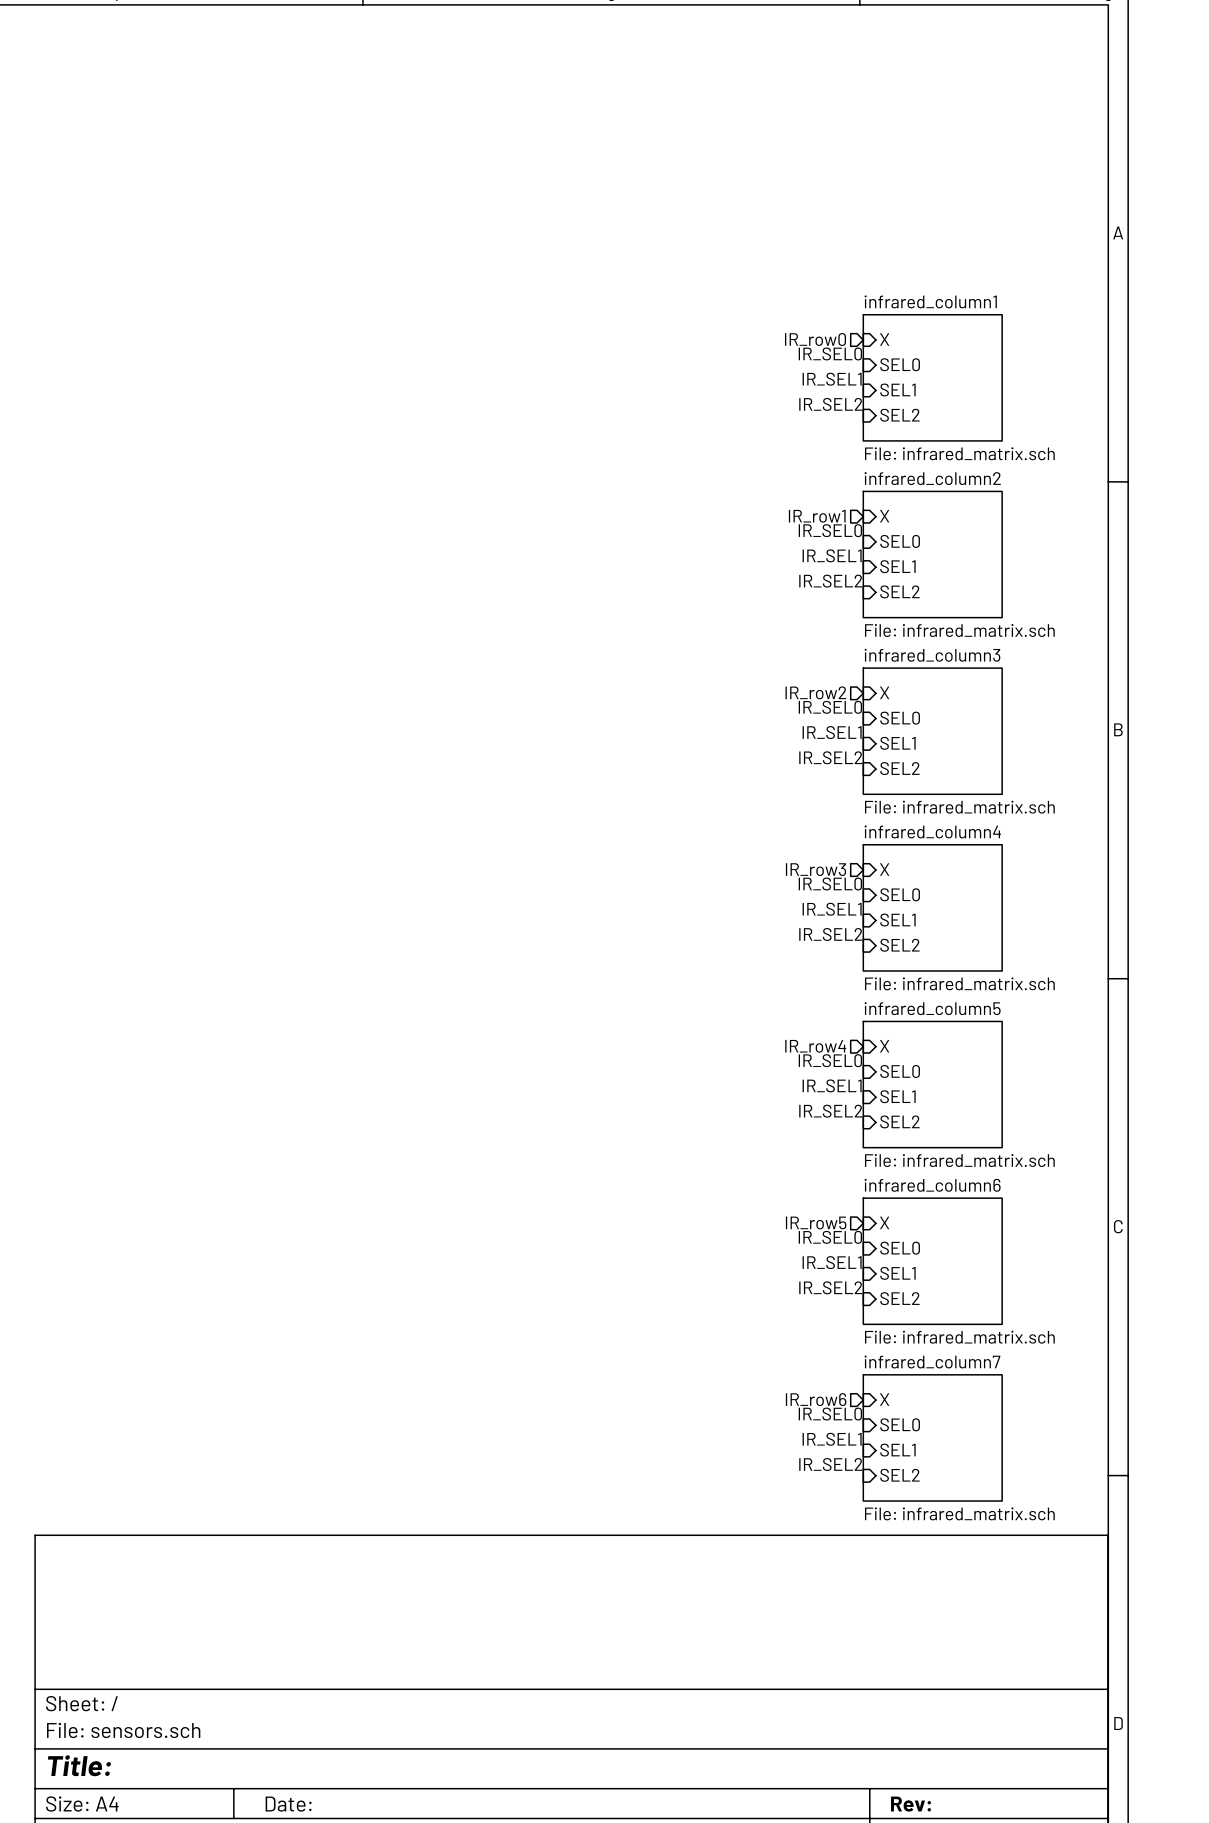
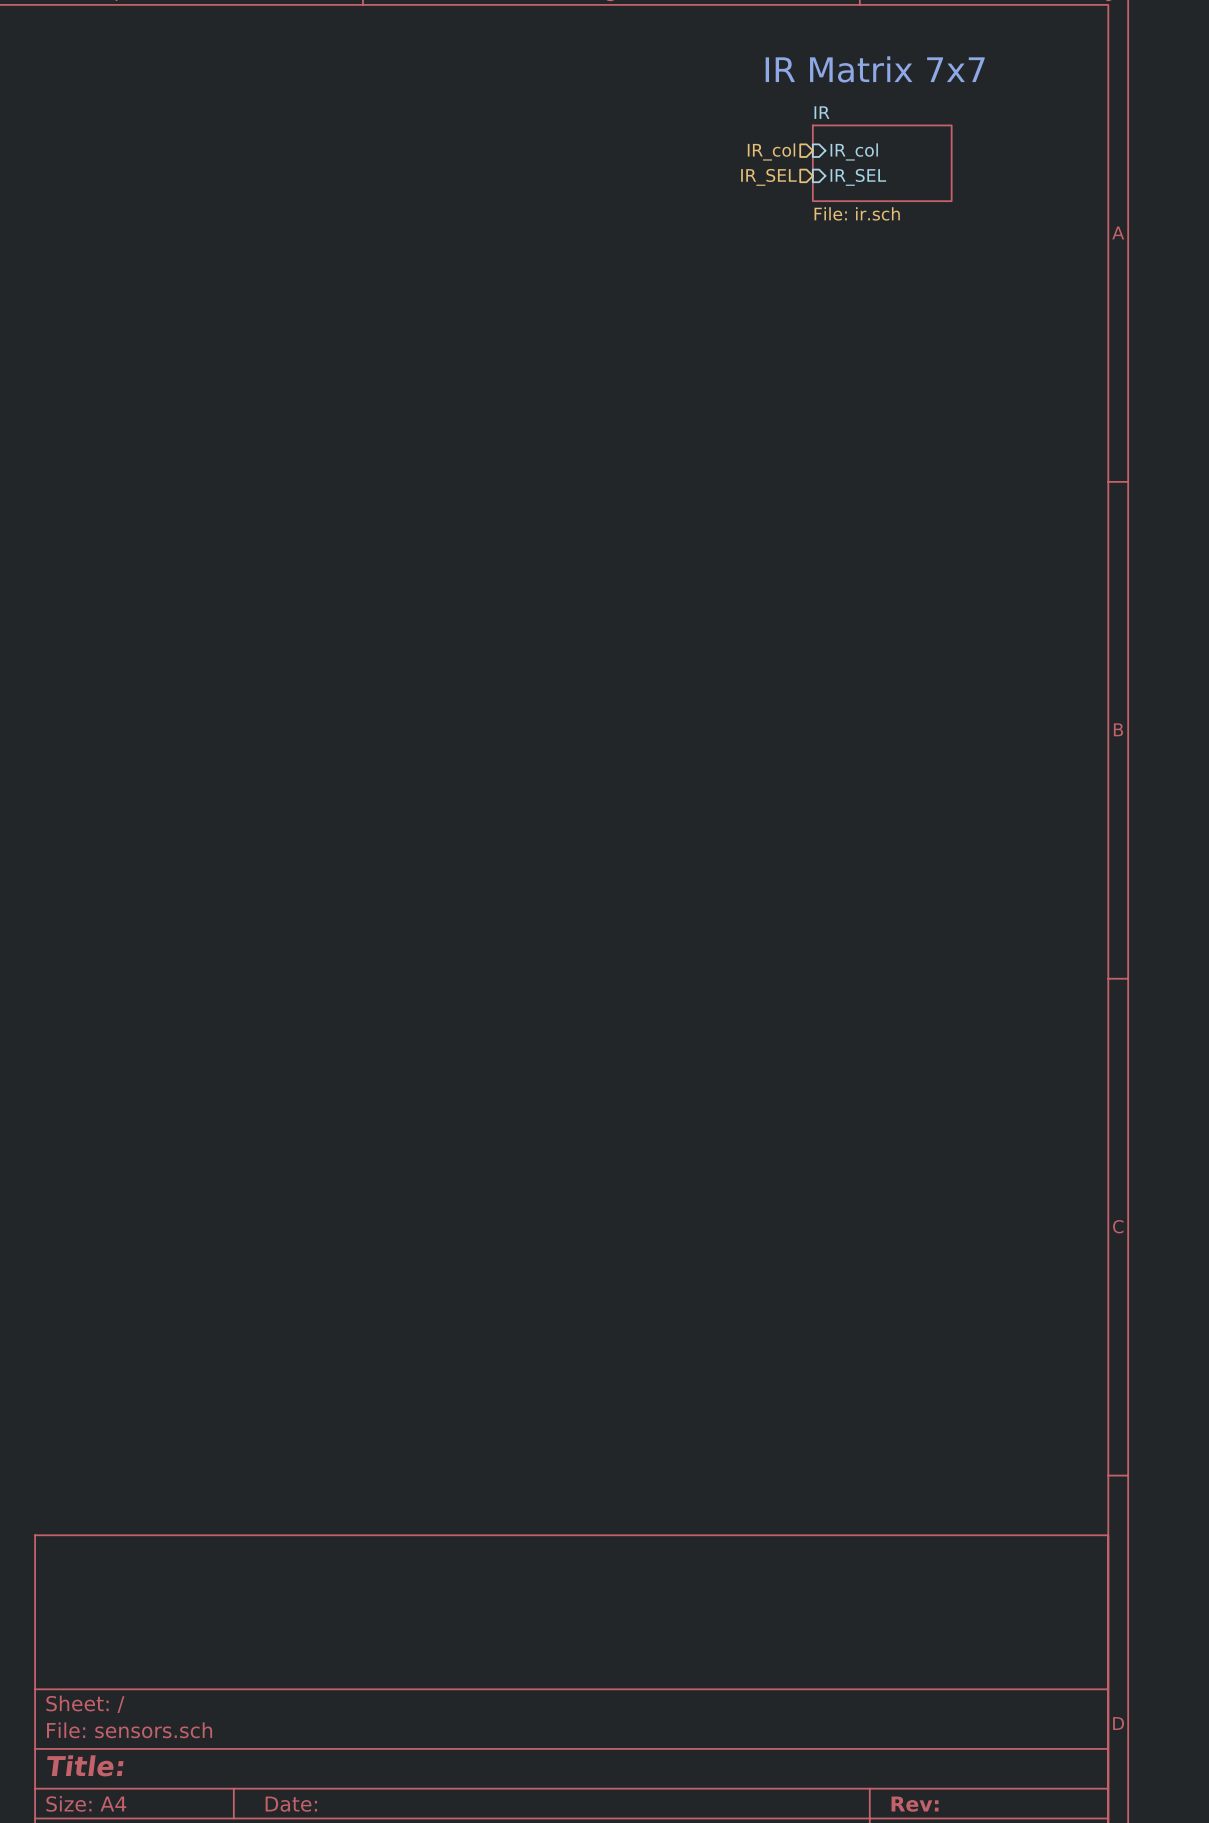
text: none -> IR Matrix 7x7 (875, 69)
hierarchical label: none -> IR_col (771, 151)
sheet pin: none -> IR_col (854, 151)
sheet IR: none -> File: ir.sch (882, 163)
hierarchical label: none -> IR_SEL (768, 177)
sheet pin: none -> IR_SEL (858, 177)
hierarchical label: IR_row0 (815, 339) -> none
sheet pin: X (884, 339) -> none
label: IR_SEL0 (830, 353) -> none
sheet pin: SEL0 (900, 364) -> none
sheet infrared_column1: File: infrared_matrix.sch (932, 377) -> none
label: IR_SEL1 (832, 379) -> none
sheet pin: SEL1 (897, 389) -> none
label: IR_SEL2 (830, 404) -> none
sheet pin: SEL2 (899, 415) -> none
hierarchical label: IR_row1 (817, 516) -> none
sheet pin: X (884, 516) -> none
label: IR_SEL0 (830, 530) -> none
sheet pin: SEL0 (900, 541) -> none
sheet infrared_column2: File: infrared_matrix.sch (932, 554) -> none
label: IR_SEL1 (832, 555) -> none
sheet pin: SEL1 (897, 566) -> none
label: IR_SEL2 (830, 581) -> none
sheet pin: SEL2 (899, 591) -> none
hierarchical label: IR_row2 (815, 692) -> none
sheet pin: X (884, 692) -> none
label: IR_SEL0 (830, 707) -> none
sheet pin: SEL0 (900, 718) -> none
sheet infrared_column3: File: infrared_matrix.sch (932, 731) -> none
label: IR_SEL1 (832, 732) -> none
sheet pin: SEL1 (897, 743) -> none
label: IR_SEL2 (830, 757) -> none
sheet pin: SEL2 (899, 768) -> none
hierarchical label: IR_row3 (816, 869) -> none
sheet pin: X (884, 869) -> none
label: IR_SEL0 (830, 884) -> none
sheet pin: SEL0 (900, 894) -> none
sheet infrared_column4: File: infrared_matrix.sch (932, 907) -> none
label: IR_SEL1 (832, 909) -> none
sheet pin: SEL1 (897, 920) -> none
label: IR_SEL2 (830, 934) -> none
sheet pin: SEL2 (899, 945) -> none
hierarchical label: IR_row4 (815, 1046) -> none
sheet pin: X (884, 1046) -> none
label: IR_SEL0 (830, 1060) -> none
sheet pin: SEL0 (900, 1071) -> none
sheet infrared_column5: File: infrared_matrix.sch (932, 1084) -> none
label: IR_SEL1 (832, 1085) -> none
sheet pin: SEL1 (897, 1096) -> none
label: IR_SEL2 (830, 1111) -> none
sheet pin: SEL2 (899, 1121) -> none
hierarchical label: IR_row5 (816, 1222) -> none
sheet pin: X (884, 1222) -> none
label: IR_SEL0 (830, 1237) -> none
sheet pin: SEL0 (900, 1248) -> none
sheet infrared_column6: File: infrared_matrix.sch (932, 1261) -> none
label: IR_SEL1 (832, 1262) -> none
sheet pin: SEL1 (897, 1273) -> none
label: IR_SEL2 (830, 1287) -> none
sheet pin: SEL2 (899, 1298) -> none
hierarchical label: IR_row6 (816, 1399) -> none
sheet pin: X (884, 1399) -> none
label: IR_SEL0 (830, 1414) -> none
sheet pin: SEL0 (900, 1424) -> none
sheet infrared_column7: File: infrared_matrix.sch (932, 1437) -> none
label: IR_SEL1 (832, 1439) -> none
sheet pin: SEL1 (897, 1450) -> none
label: IR_SEL2 (830, 1464) -> none
sheet pin: SEL2 (899, 1475) -> none

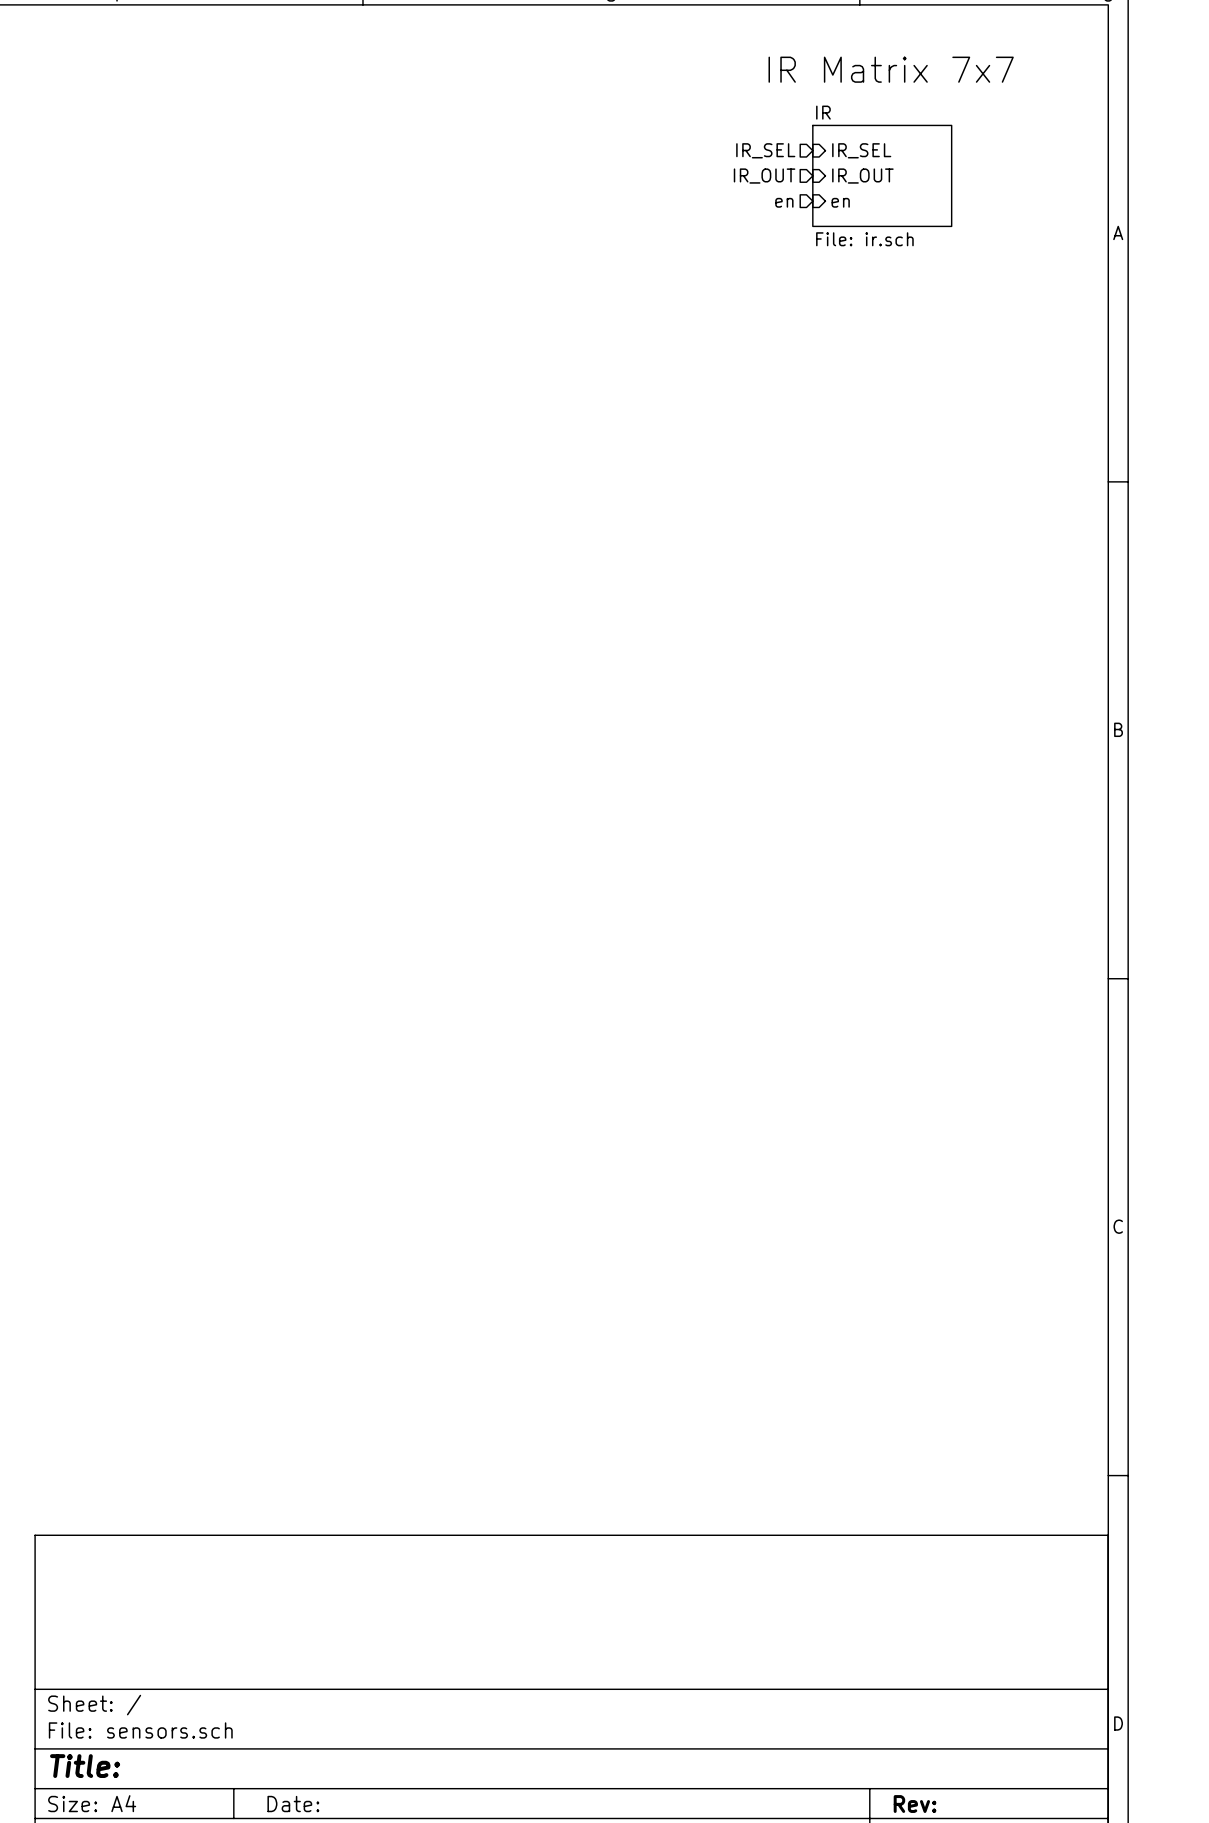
hierarchical label: IR_col (771, 151) -> IR_SEL (765, 150)
sheet pin: IR_col (854, 151) -> IR_SEL (861, 150)
sheet IR: File: ir.sch (882, 163) -> none
sheet IR: none -> File: ir.sch (882, 175)
hierarchical label: IR_SEL (768, 177) -> IR_OUT (764, 176)
sheet pin: IR_SEL (858, 177) -> IR_OUT (862, 176)
hierarchical label: none -> en (784, 202)
sheet pin: none -> en (840, 202)

